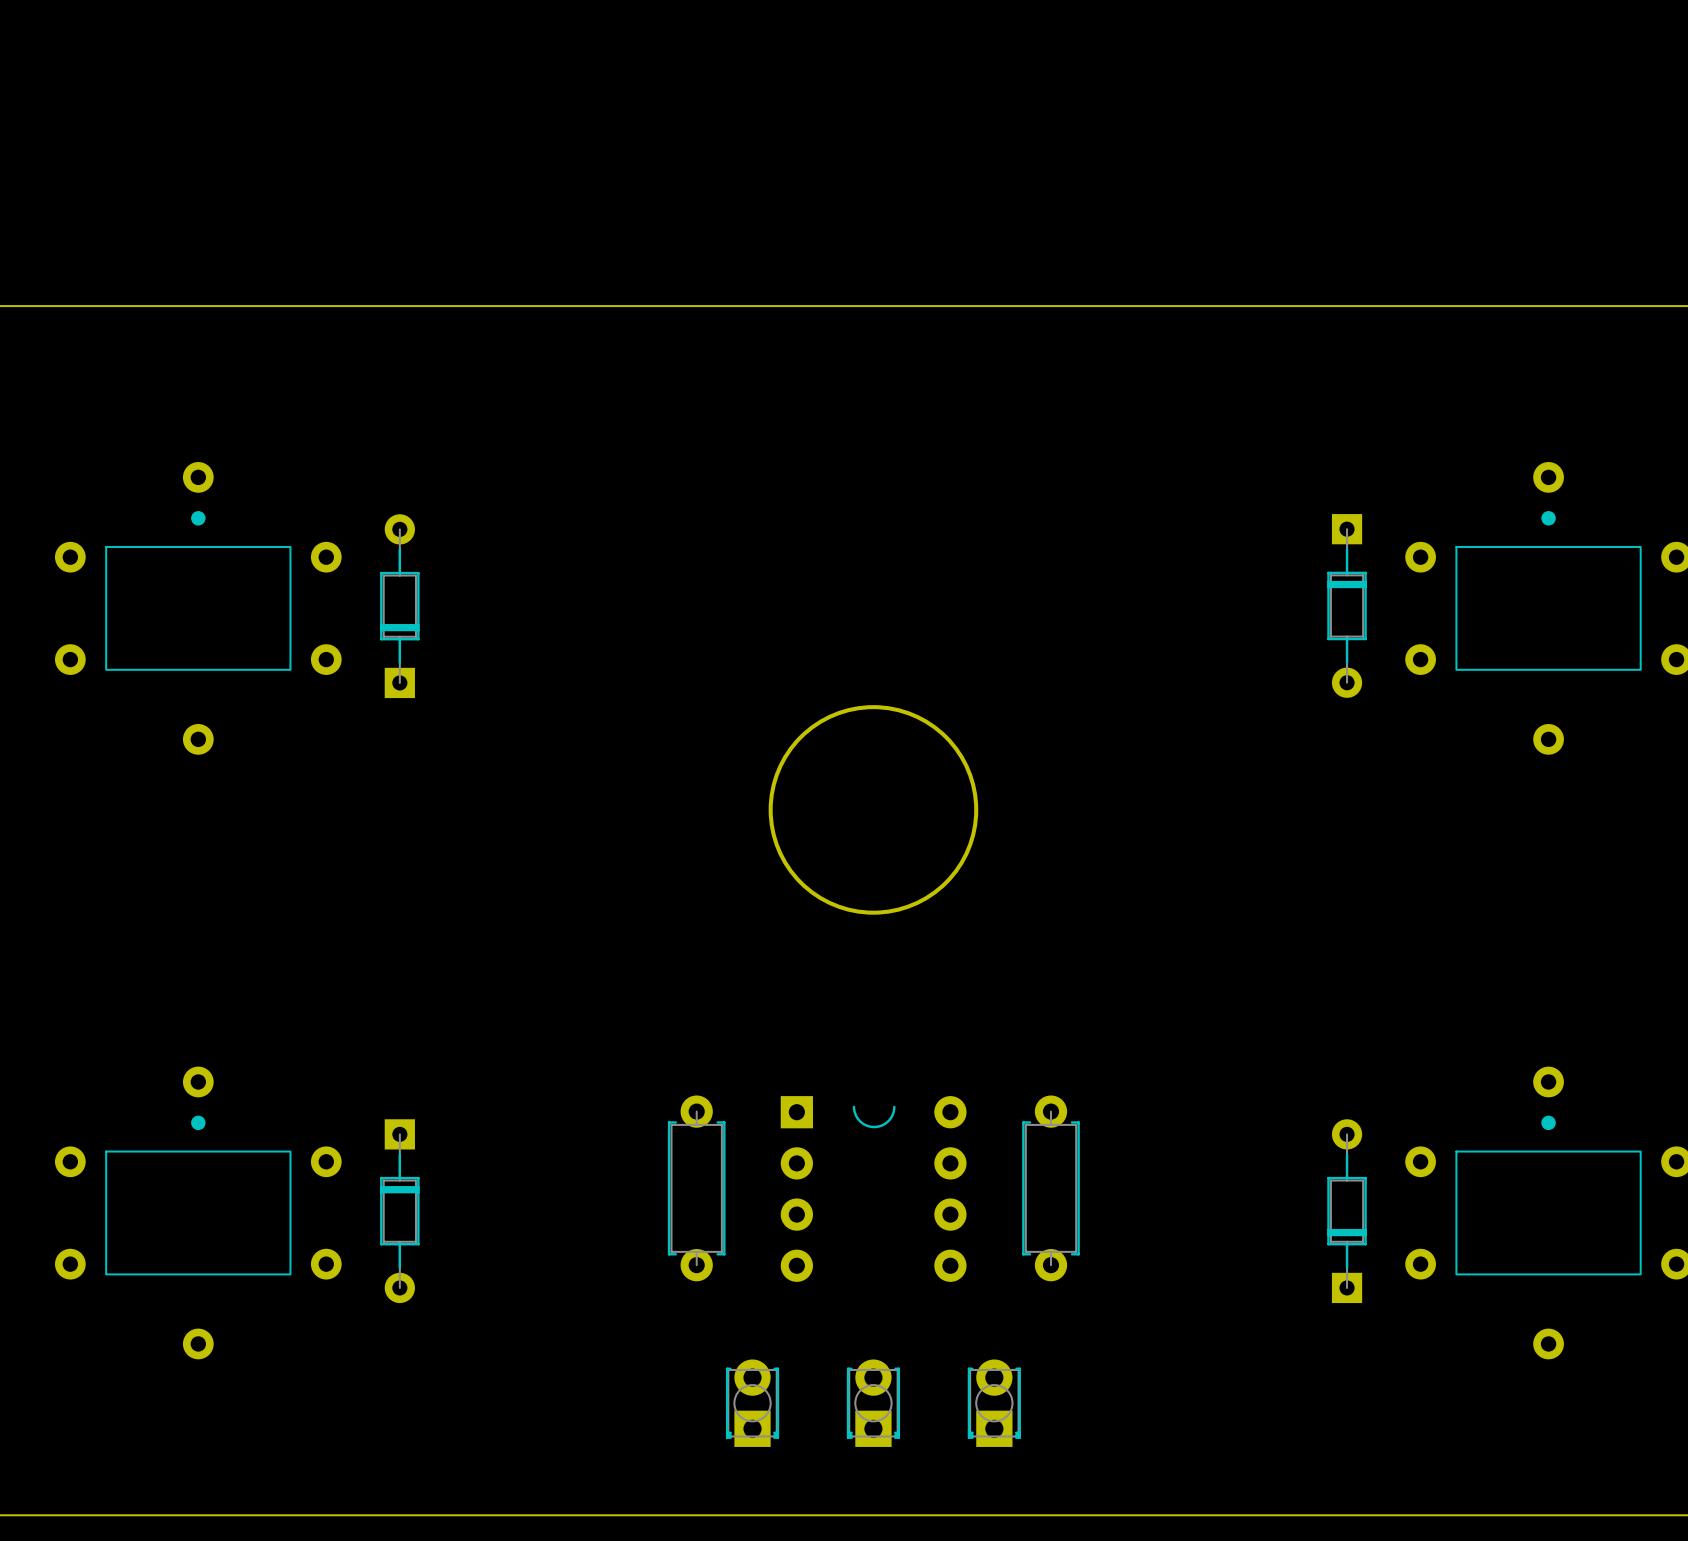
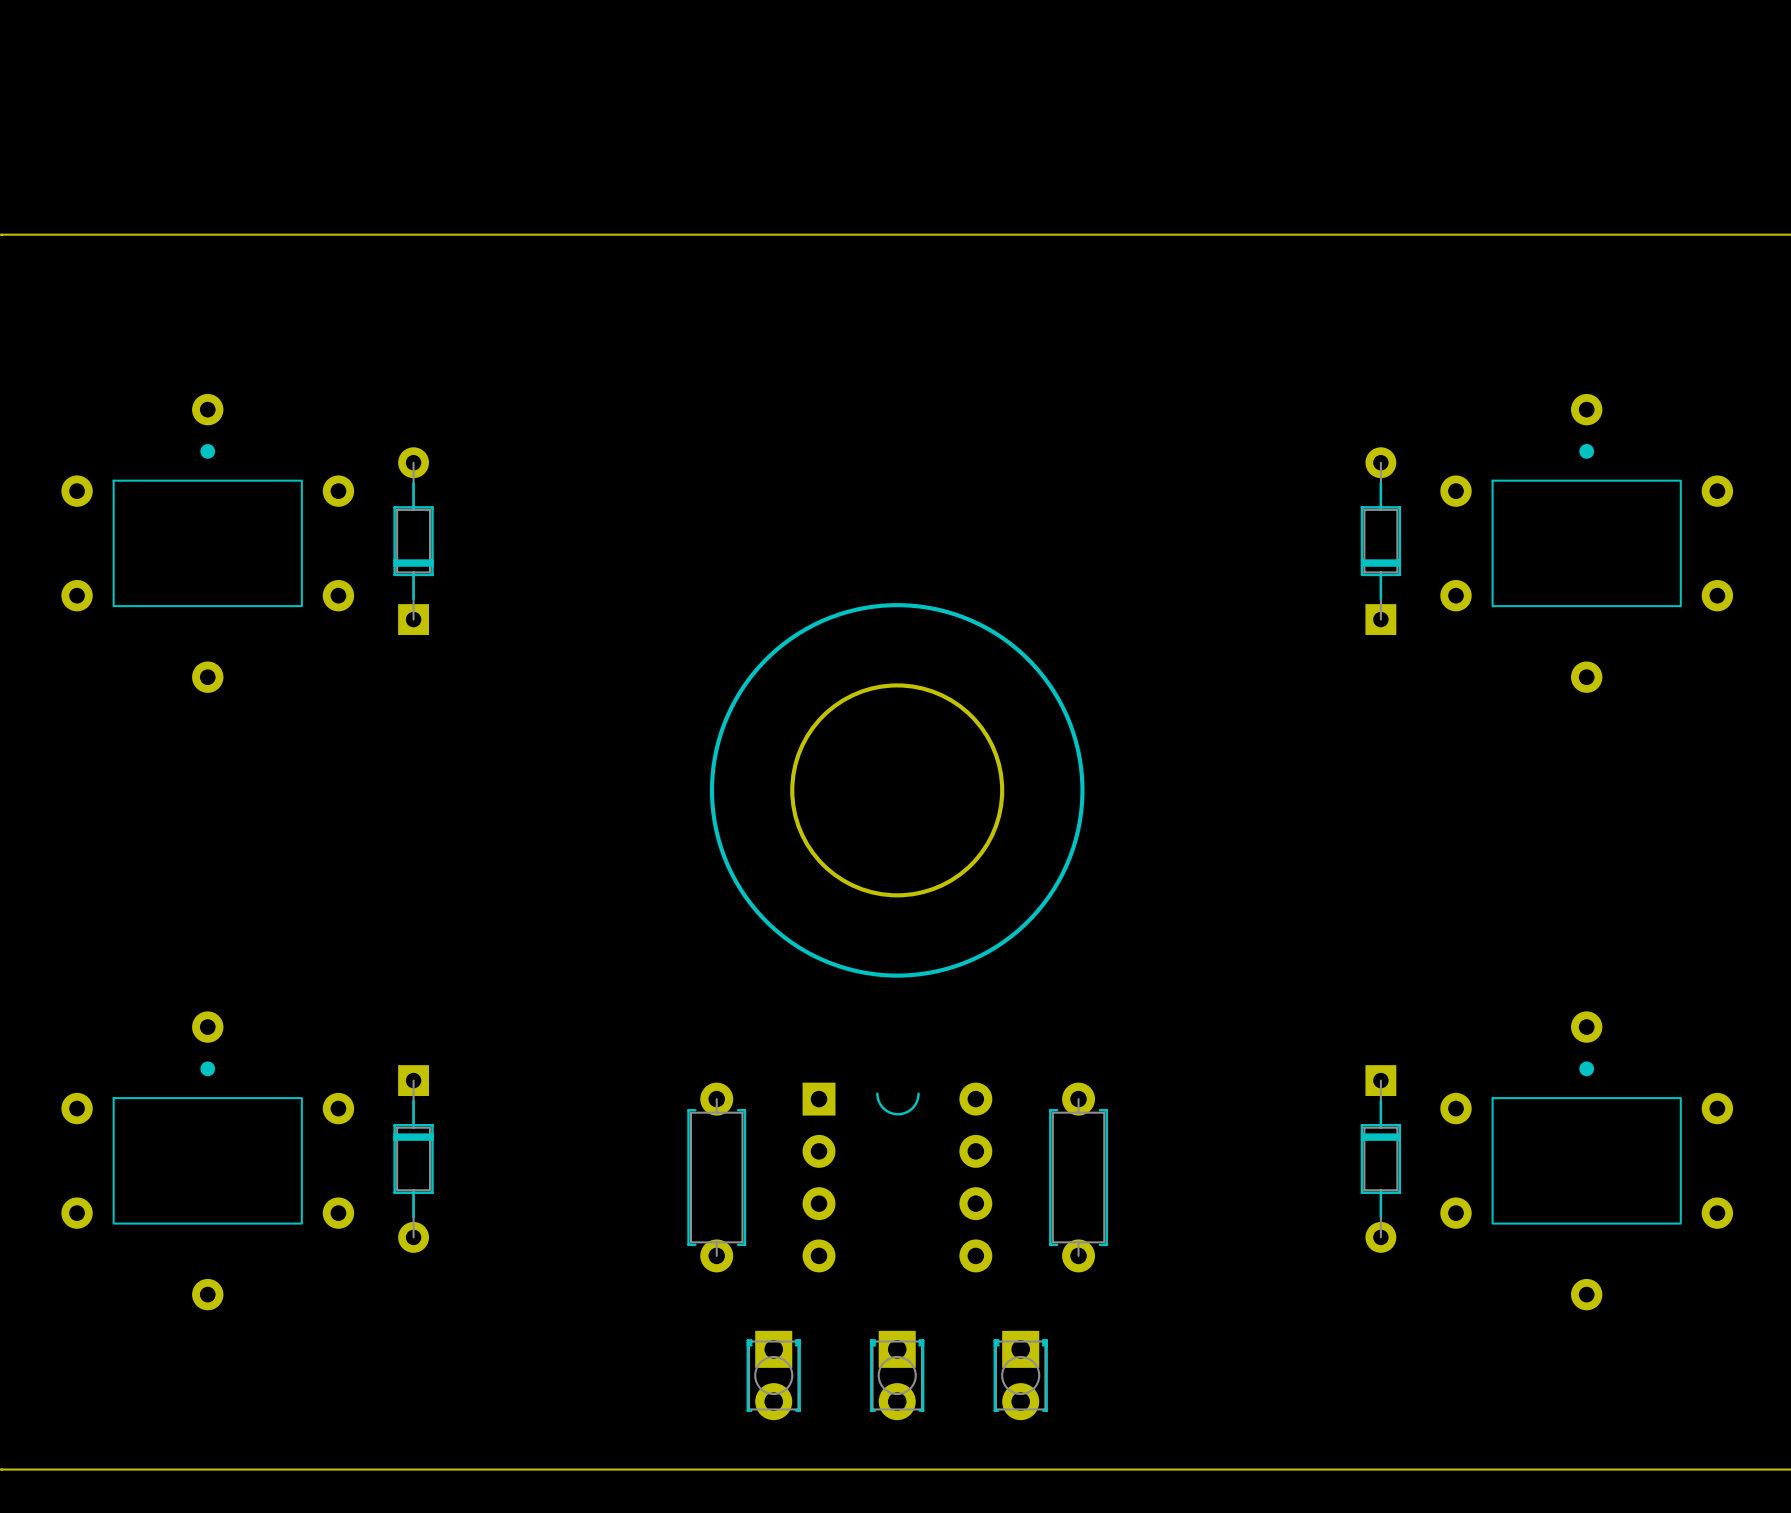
part rotation: 0° (1347, 605) -> 180° (1380, 541)
drawing: none -> [709, 603, 1085, 978]
round board edge position: (873, 809) -> (897, 790)
part position: (696, 1188) -> (716, 1177)
part position: (873, 1188) -> (897, 1177)
part position: (1050, 1188) -> (1078, 1177)
part rotation: 0° (1347, 1211) -> 180° (1380, 1158)
part rotation: 0° (752, 1403) -> 180° (773, 1375)
part rotation: 0° (873, 1403) -> 180° (897, 1375)
part rotation: 0° (994, 1403) -> 180° (1020, 1375)

